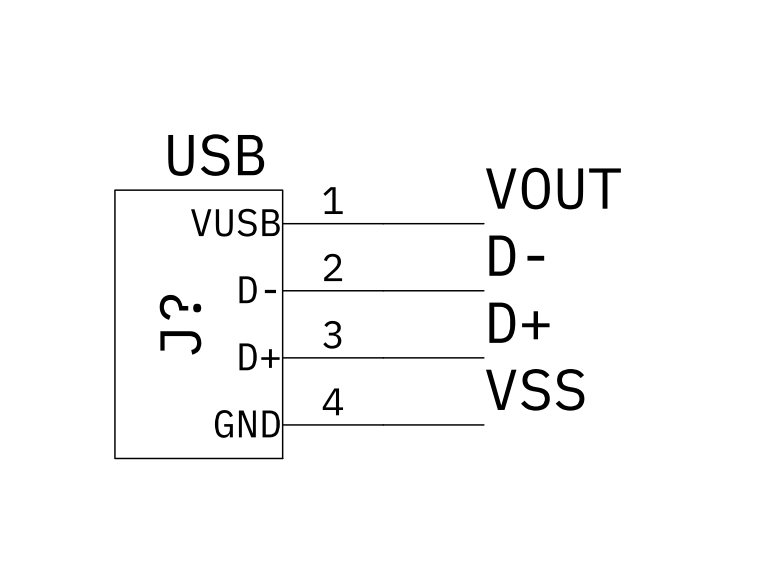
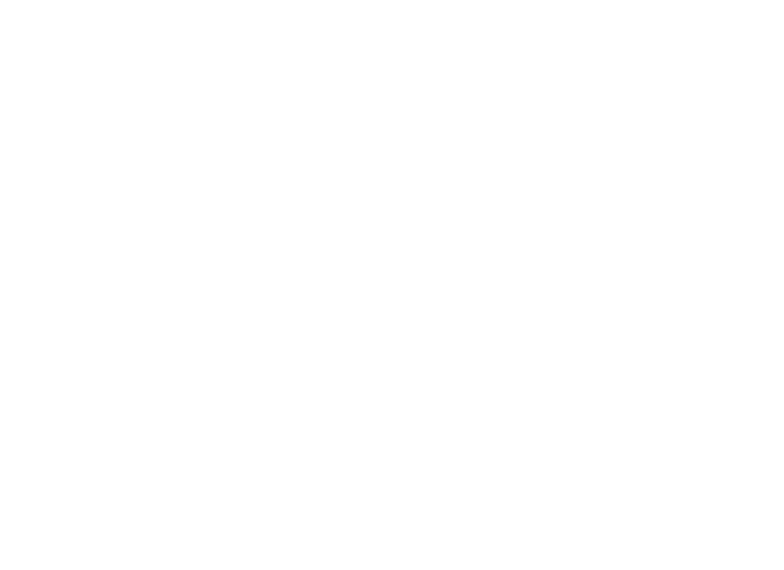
label: VOUT (553, 188) -> none
wire: (383, 223) (483, 223) -> none
label: D- (516, 255) -> none
wire: (383, 290) (483, 290) -> none
label: D+ (519, 322) -> none
J?: USB (249, 324) -> none
wire: (383, 357) (483, 357) -> none
label: VSS (535, 389) -> none
wire: (383, 424) (483, 424) -> none

